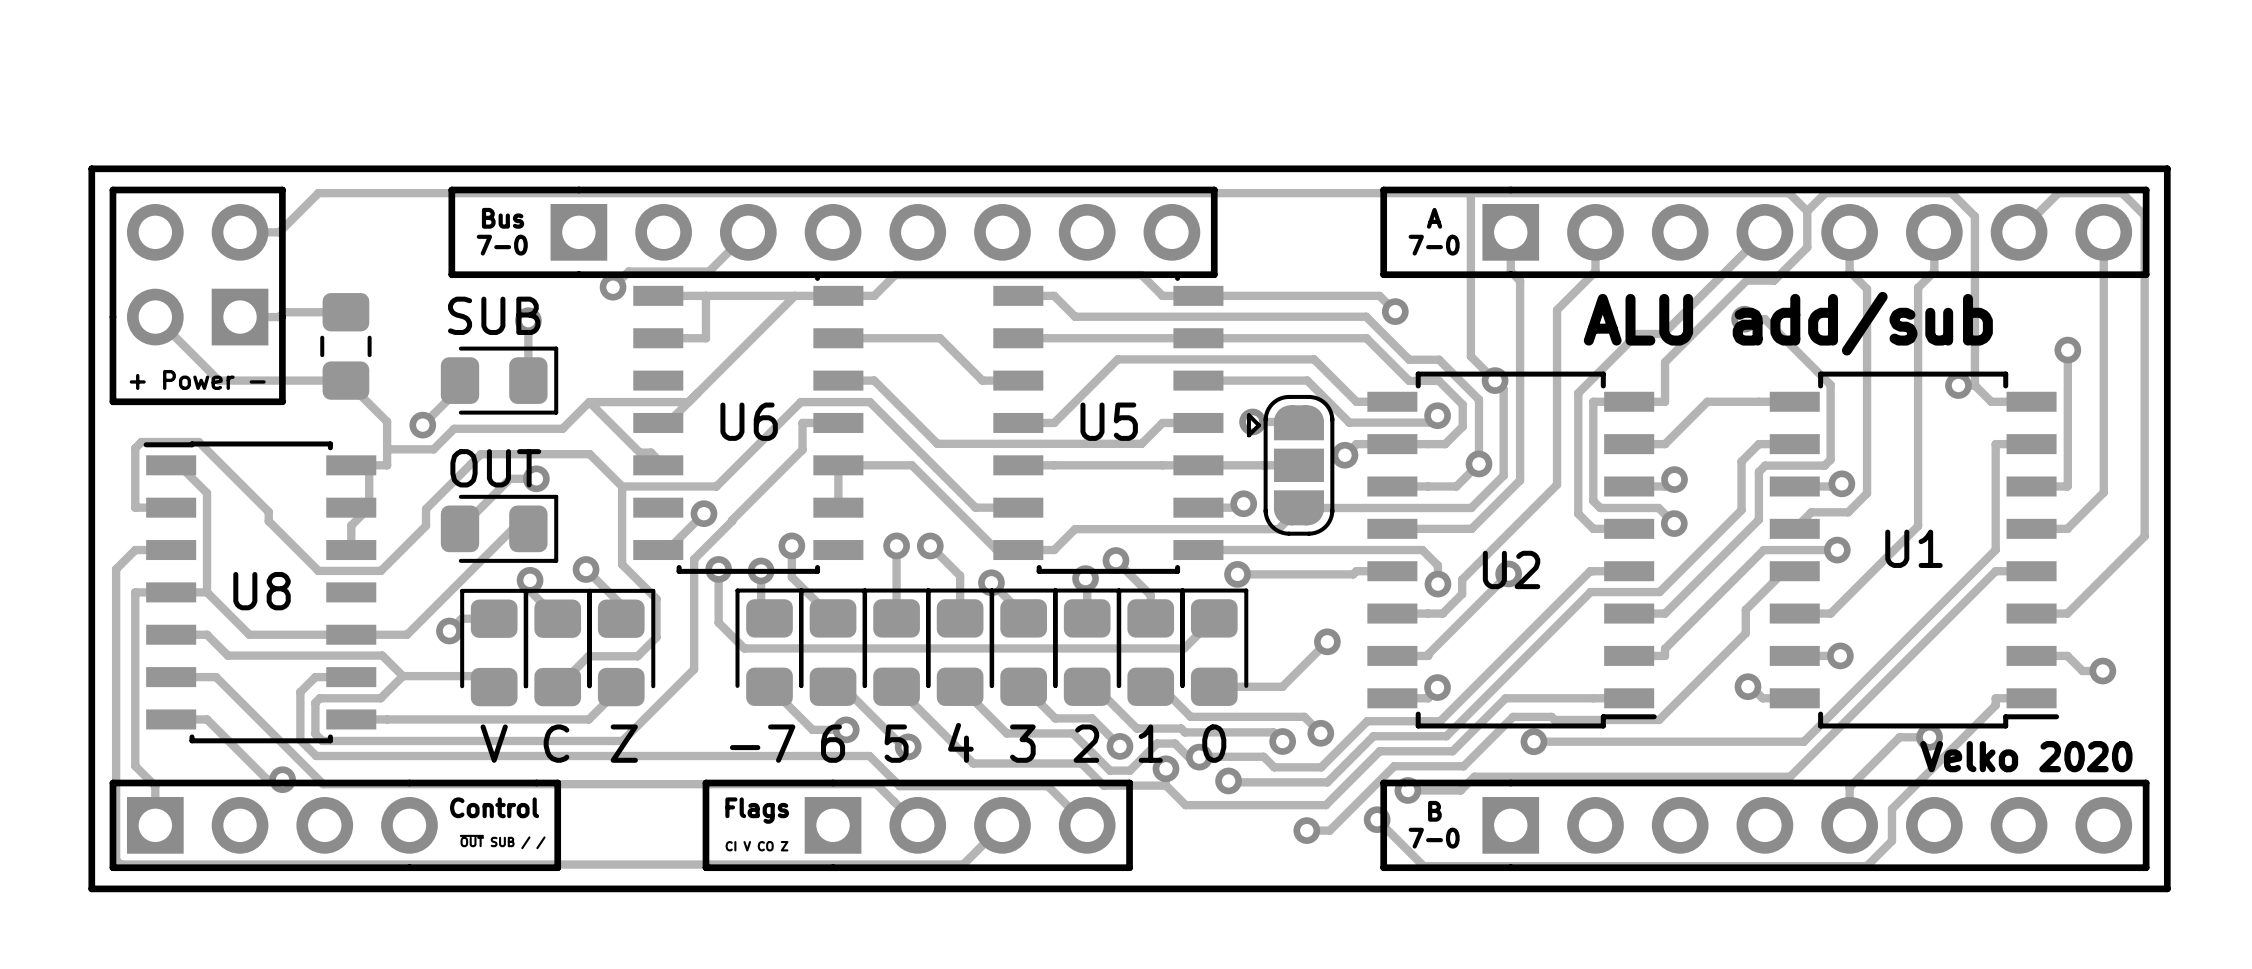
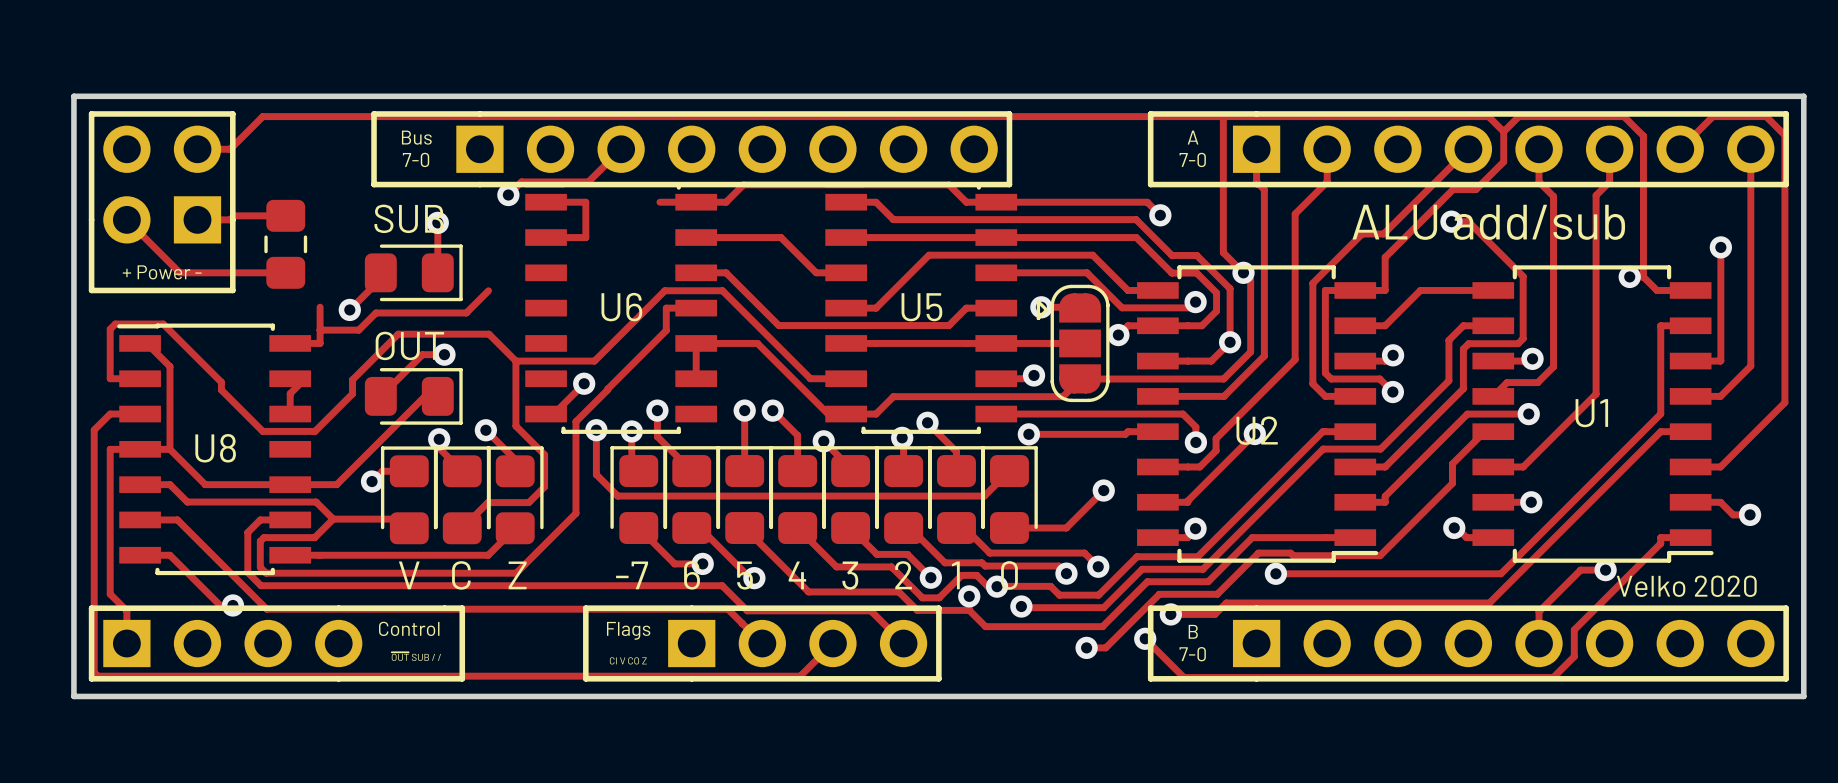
track: (705, 295) (794, 295) (667, 422) -> none
track: (345, 380) (387, 421) -> none
track: (688, 402) (589, 402) (639, 452) (650, 452) (658, 459) -> none
track: (369, 465) (369, 507) -> none

